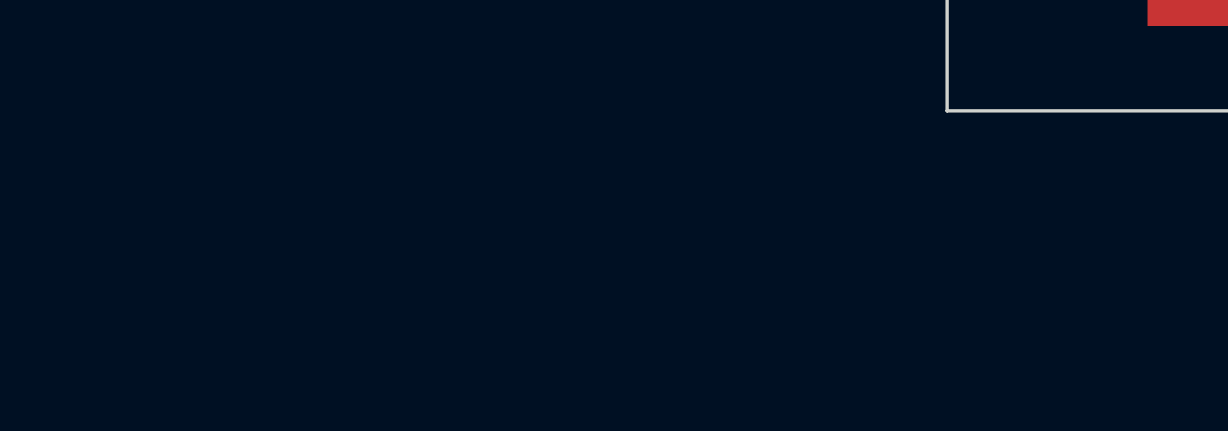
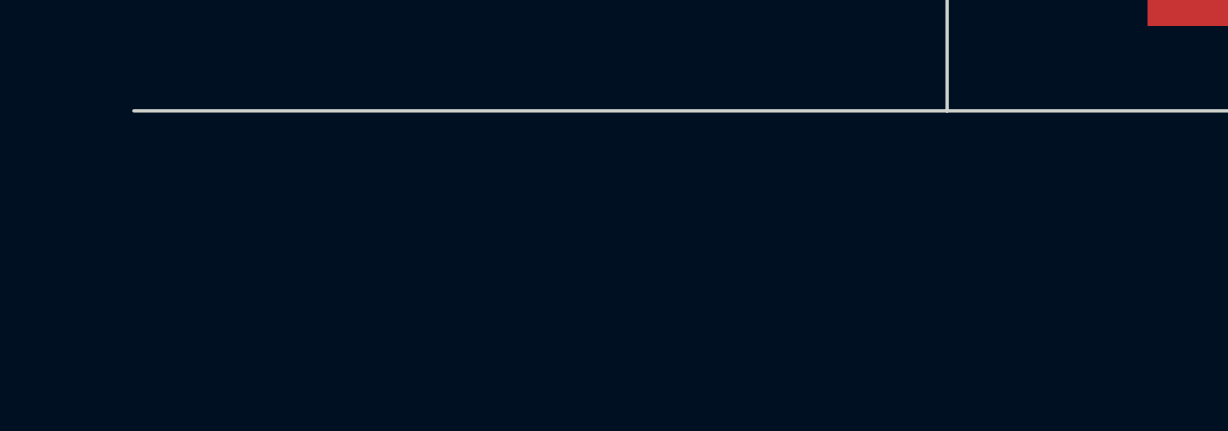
board edge: none -> (133, 110) (947, 110)

